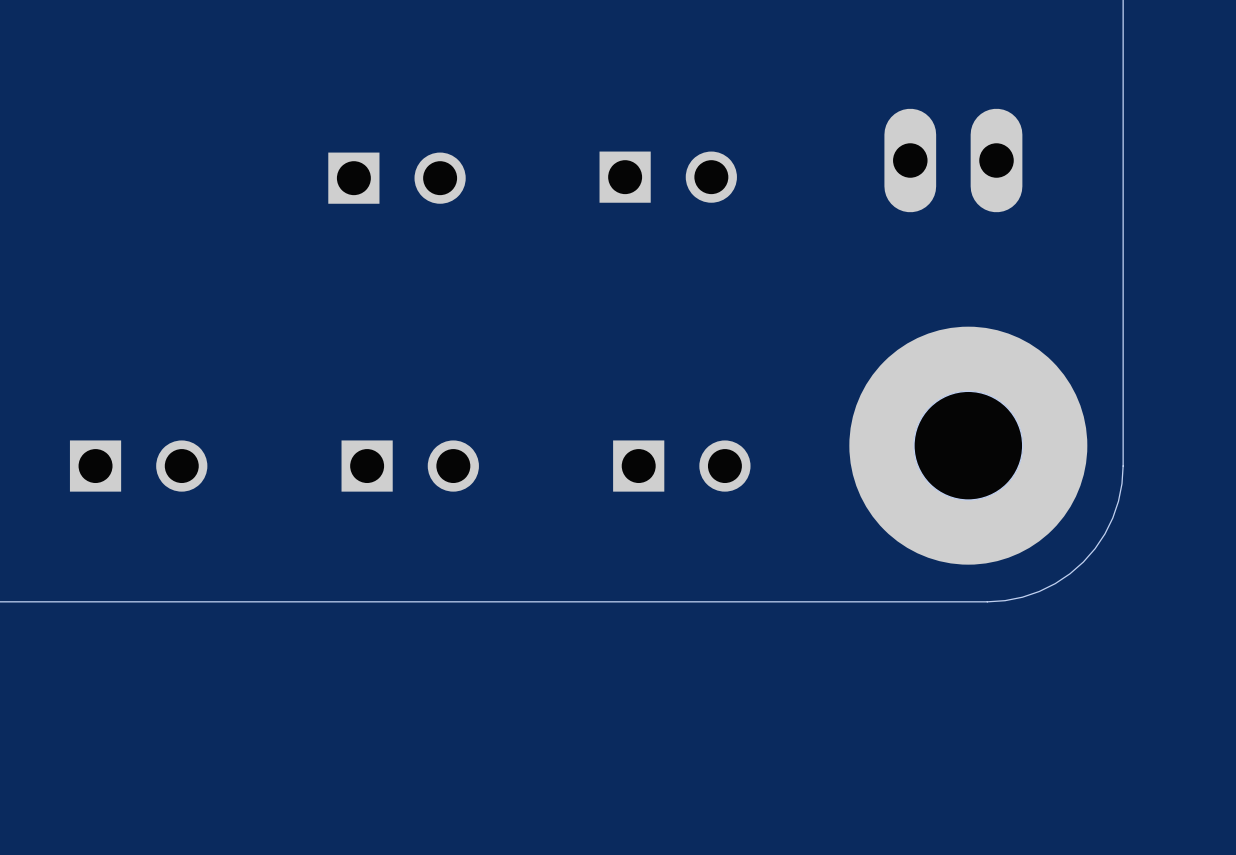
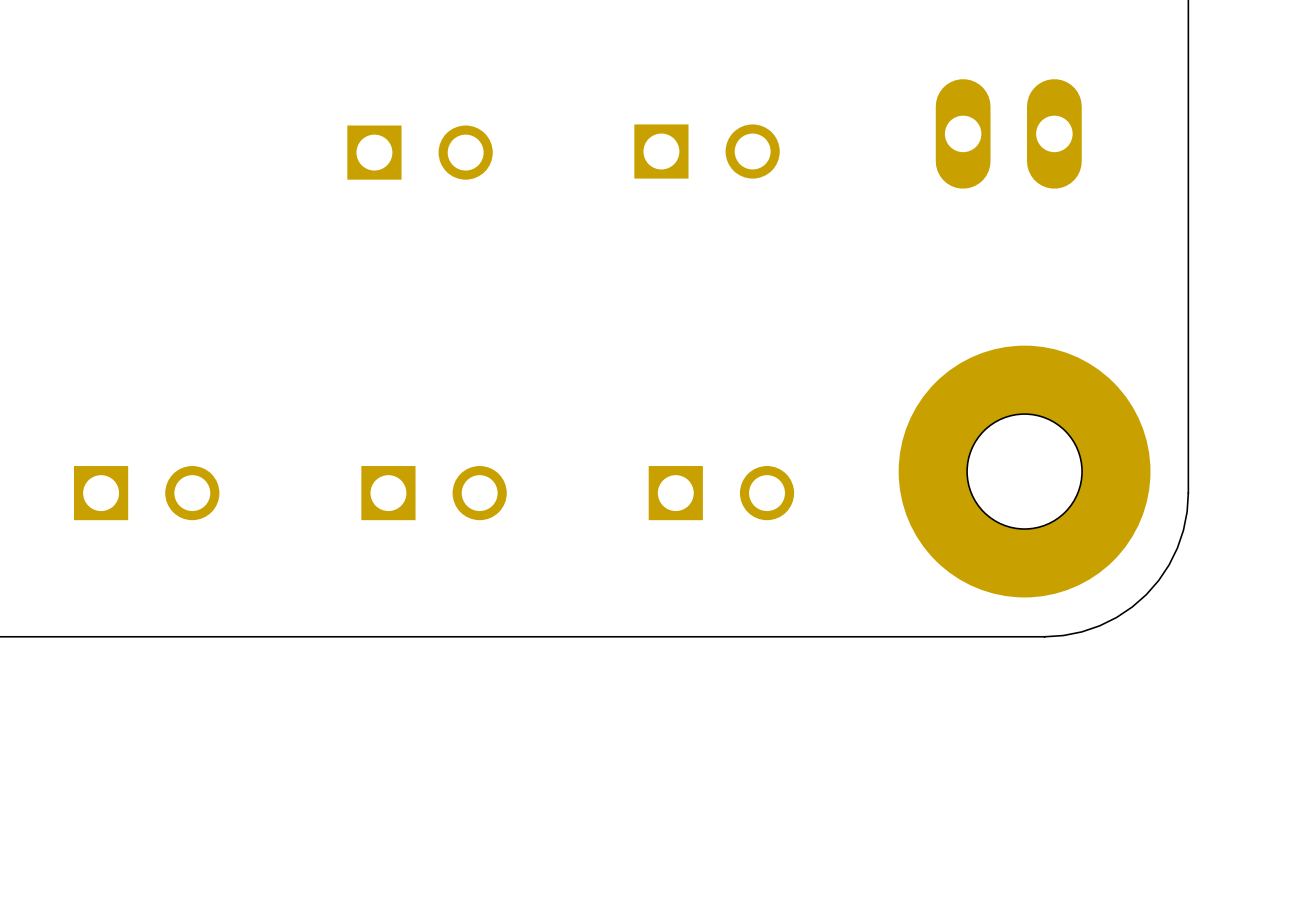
part position: (953, 160) -> (1008, 133)
part position: (668, 177) -> (707, 151)
part position: (396, 178) -> (420, 152)

